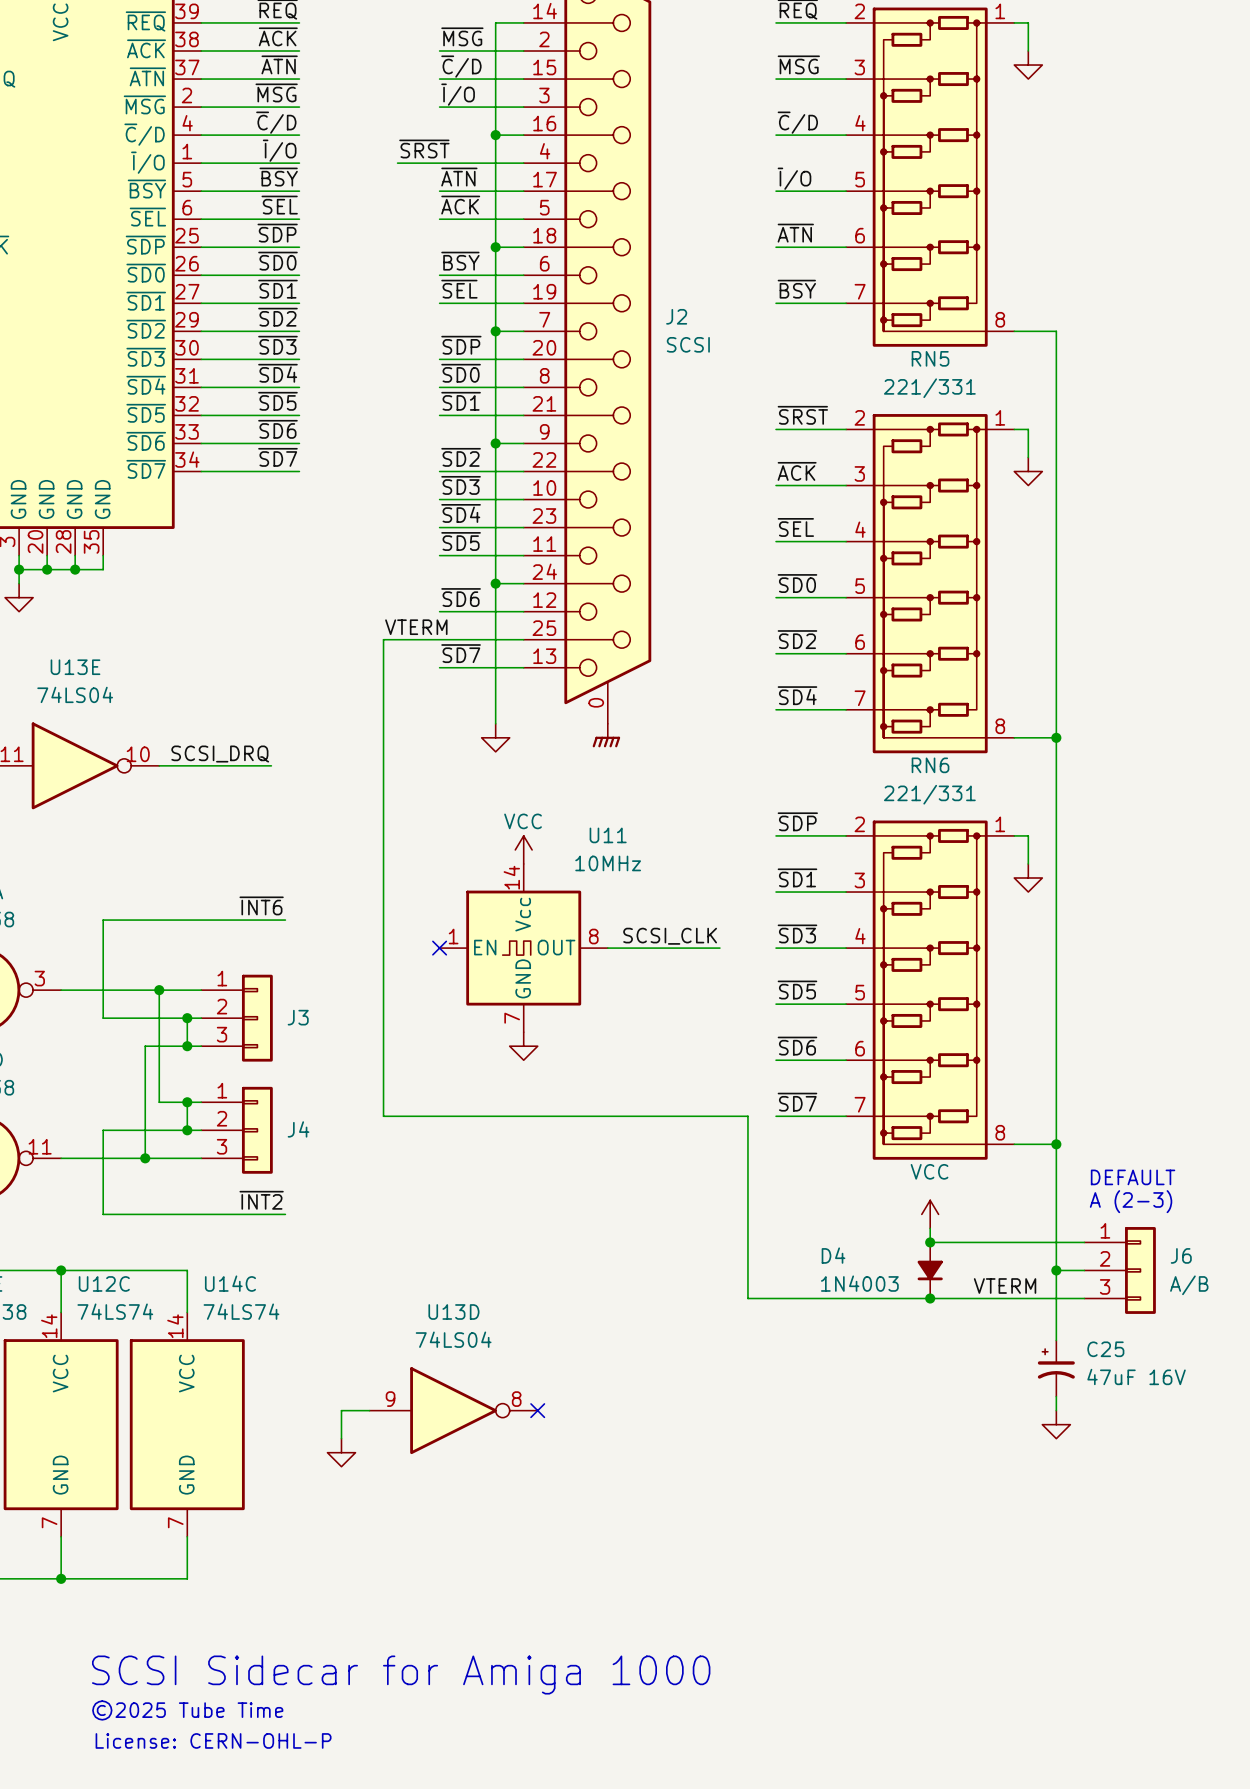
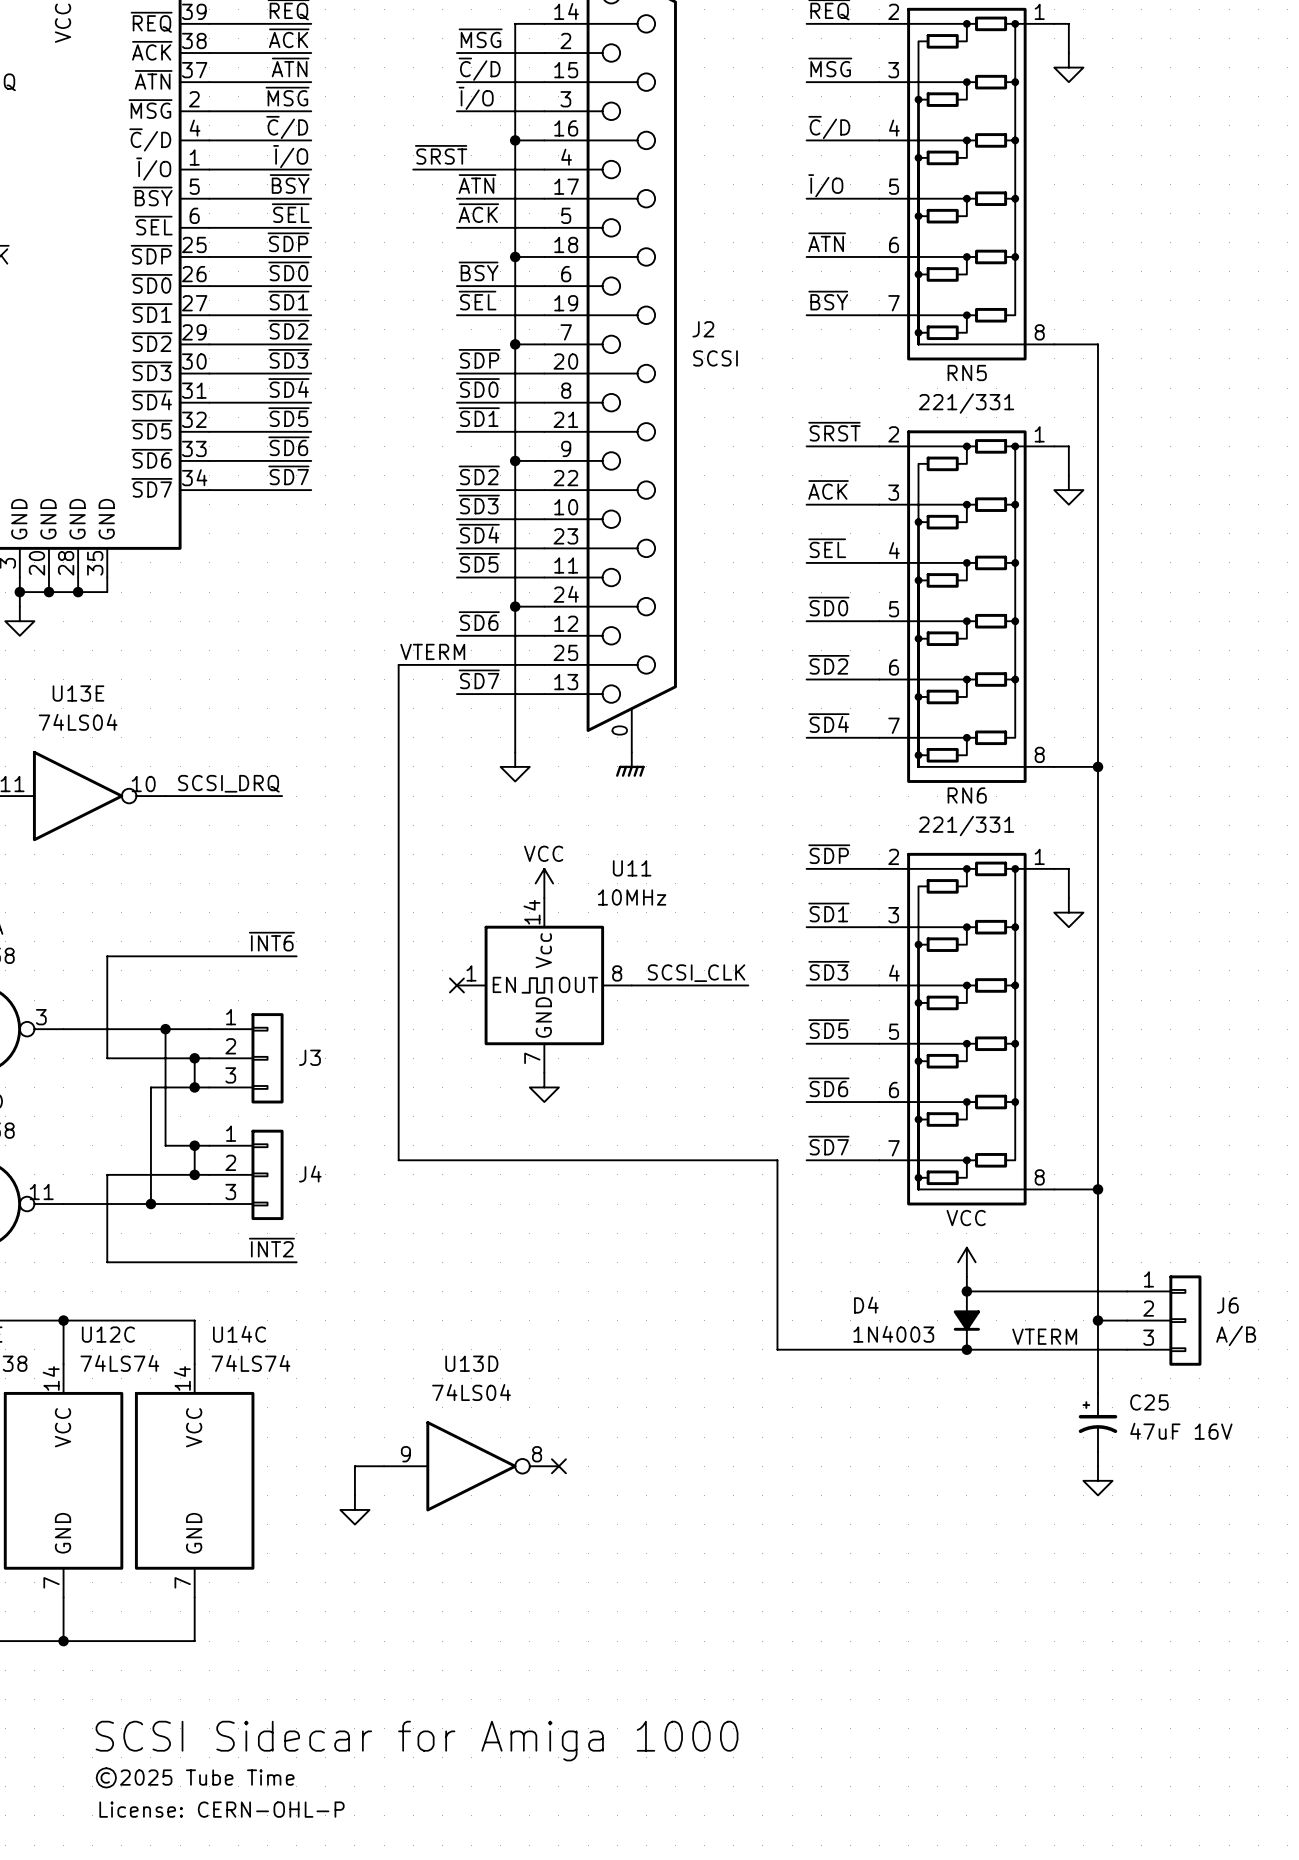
text: DEFAULT (1133, 1177) -> none
text: A (2-3) (1131, 1201) -> none

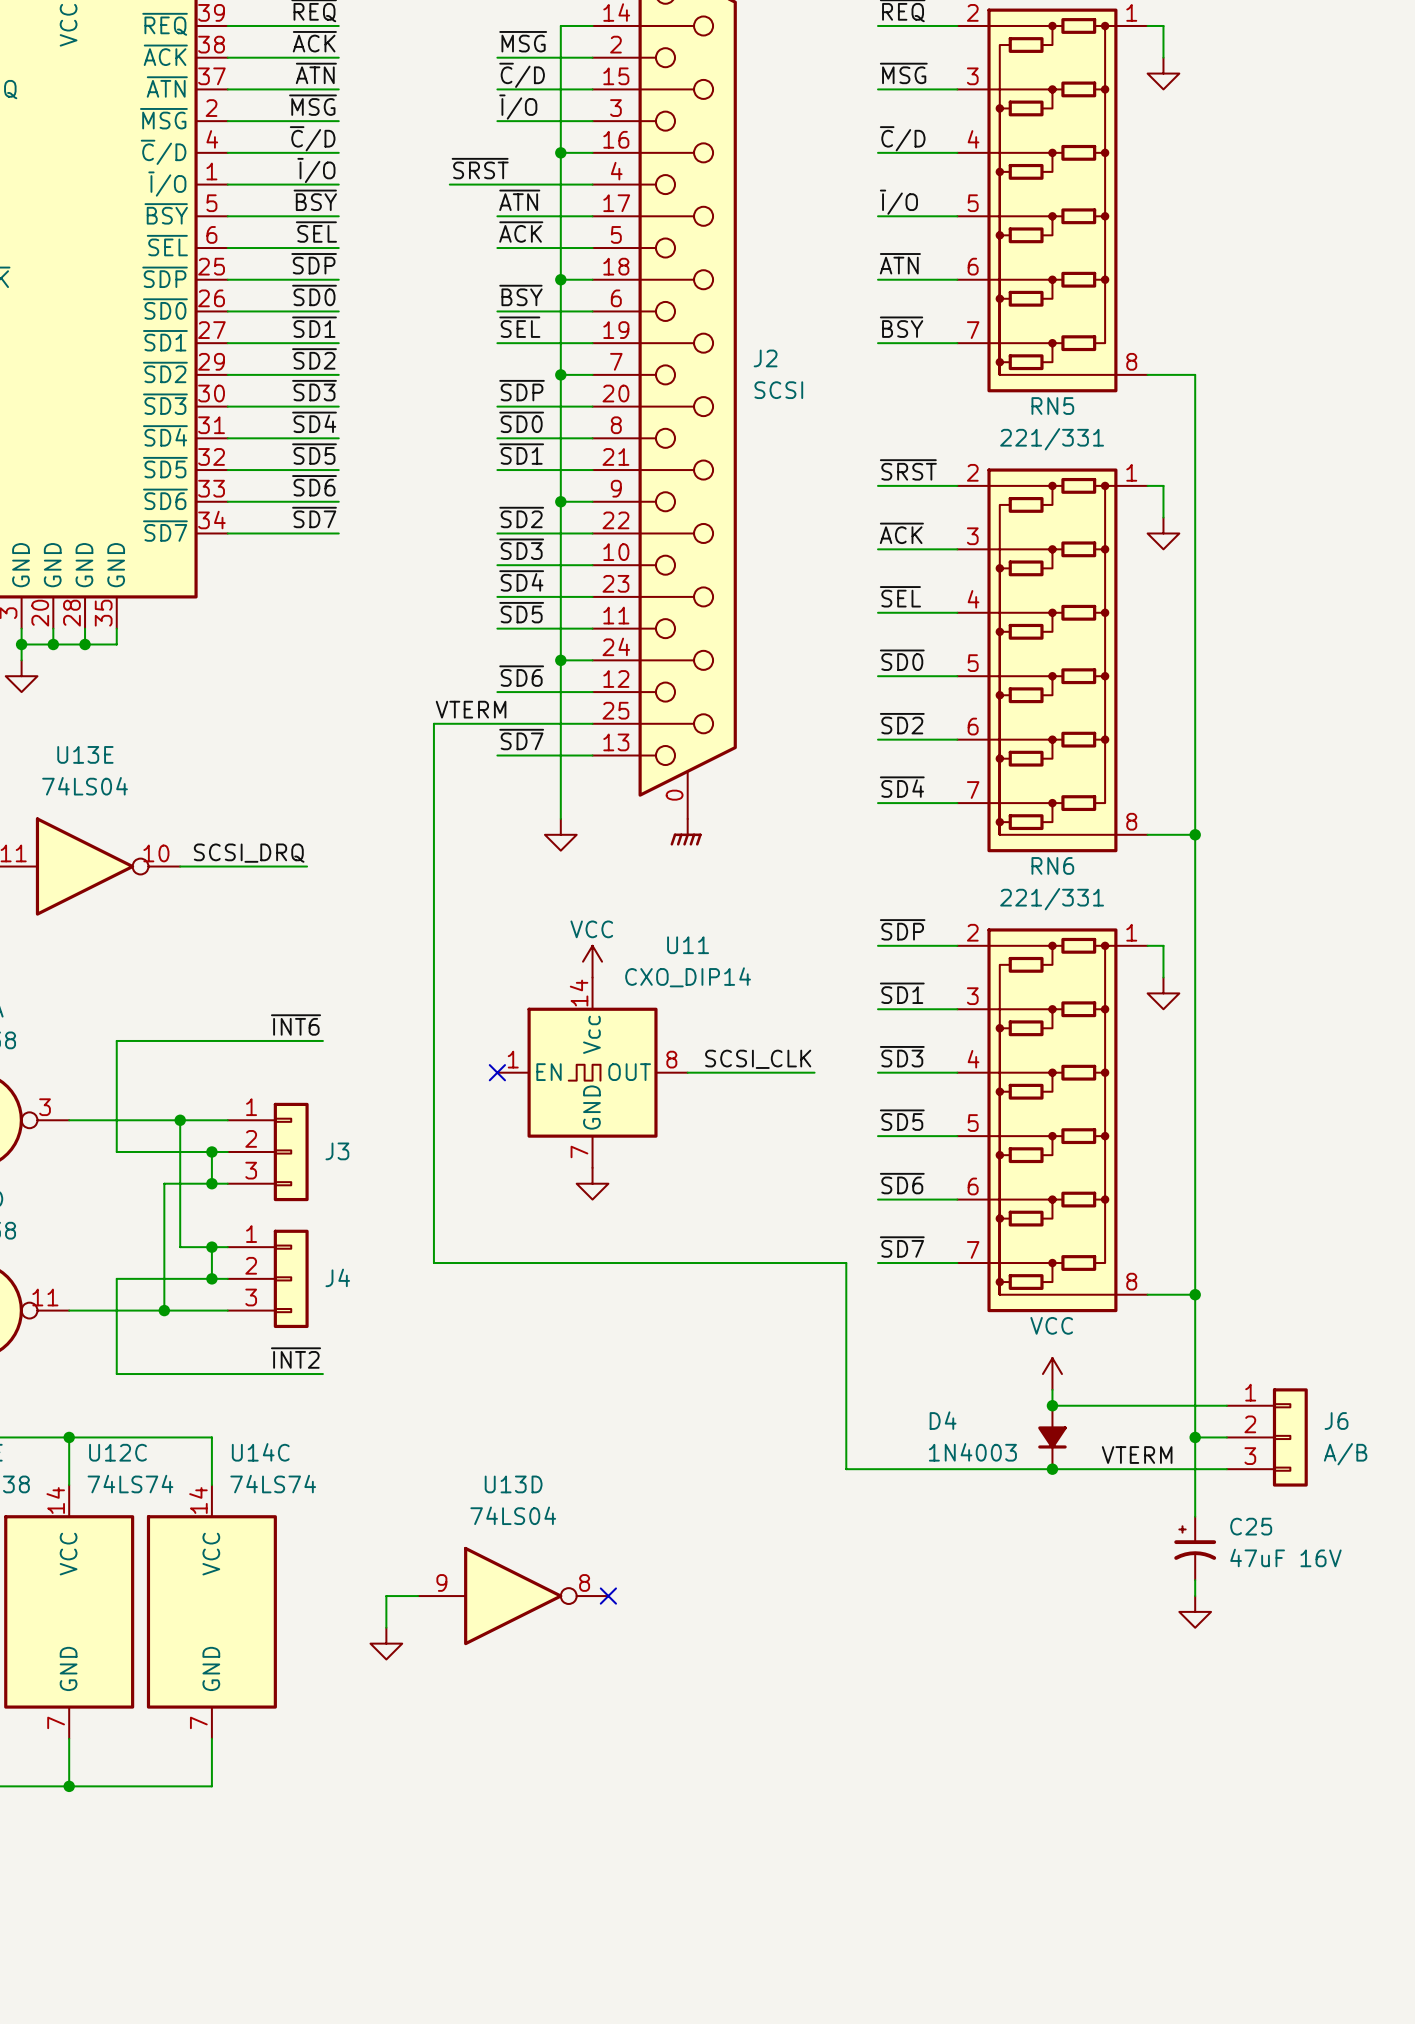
U11 value: 10MHz (632, 897) -> CXO_DIP14 (688, 977)
text: SCSI Sidecar for Amiga 1000 (417, 1741) -> none
text: ©2025 Tube Time (195, 1777) -> none
text: License: CERN-OHL-P (221, 1809) -> none

